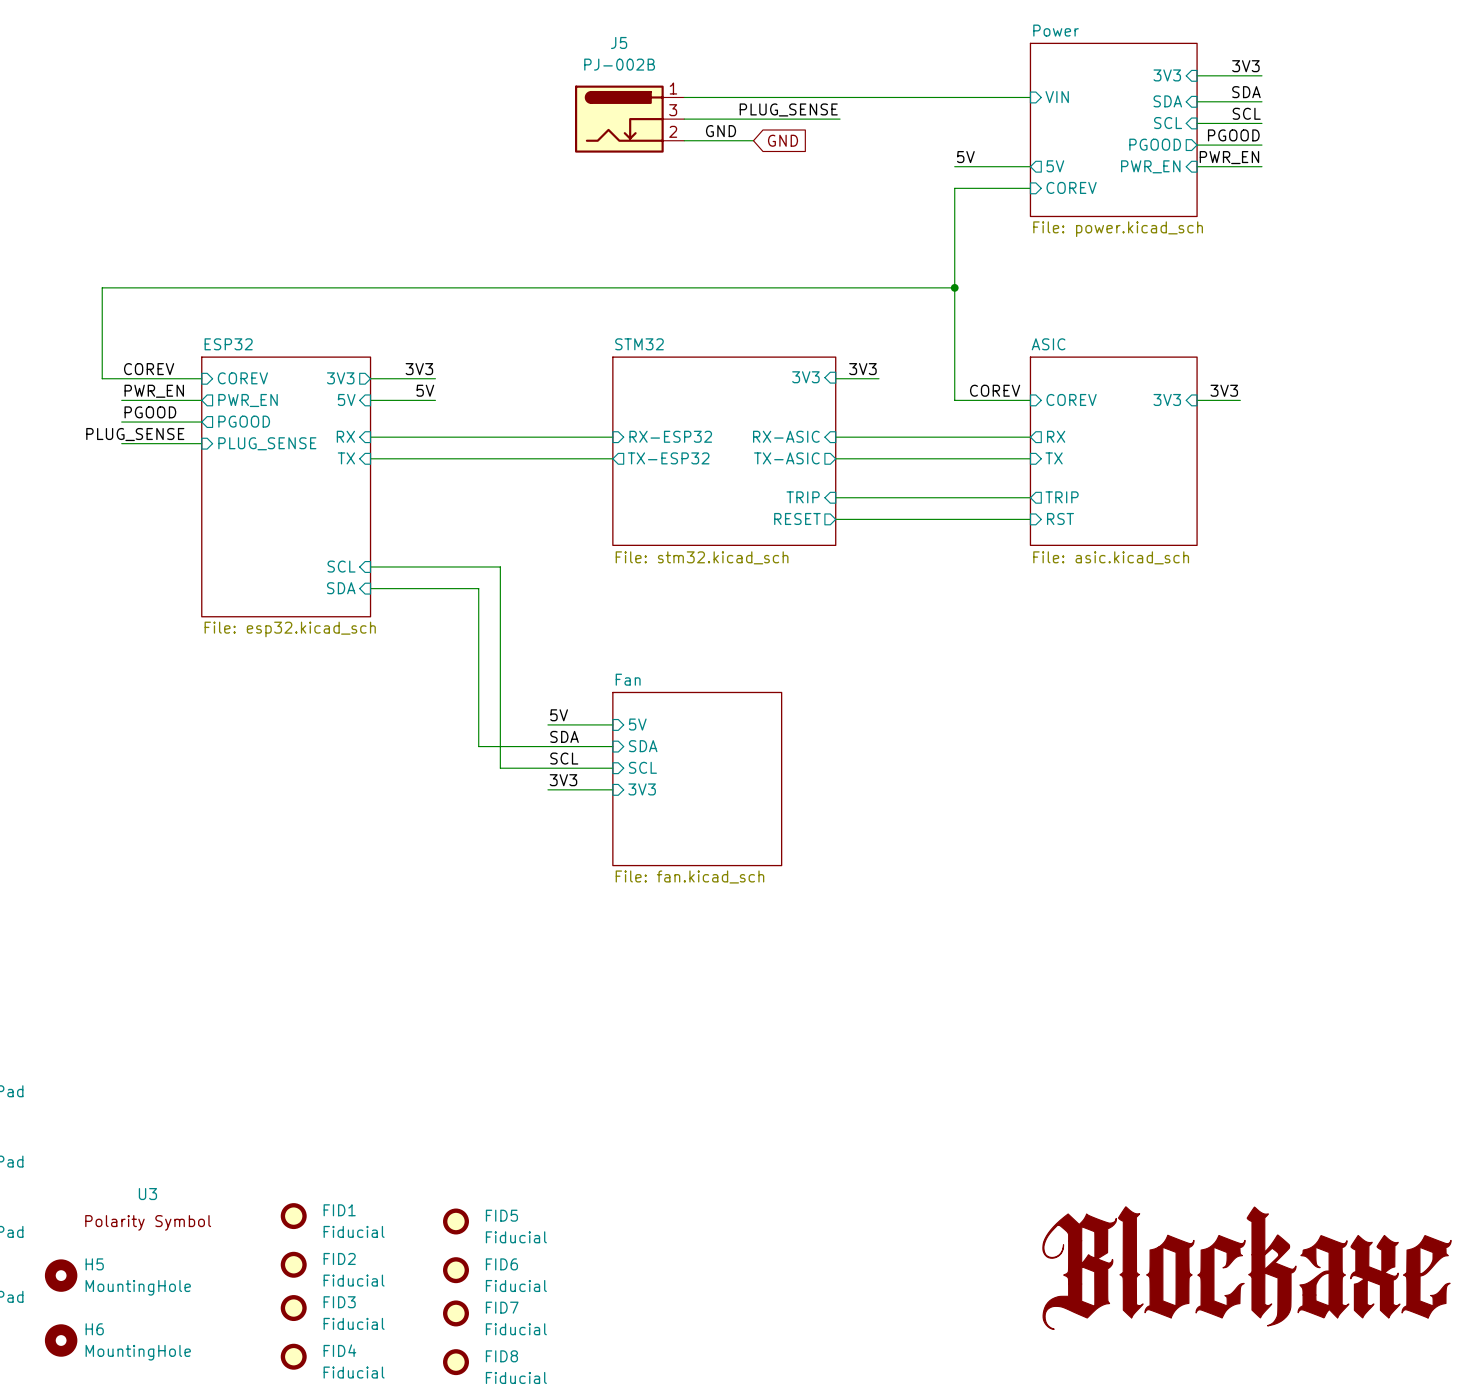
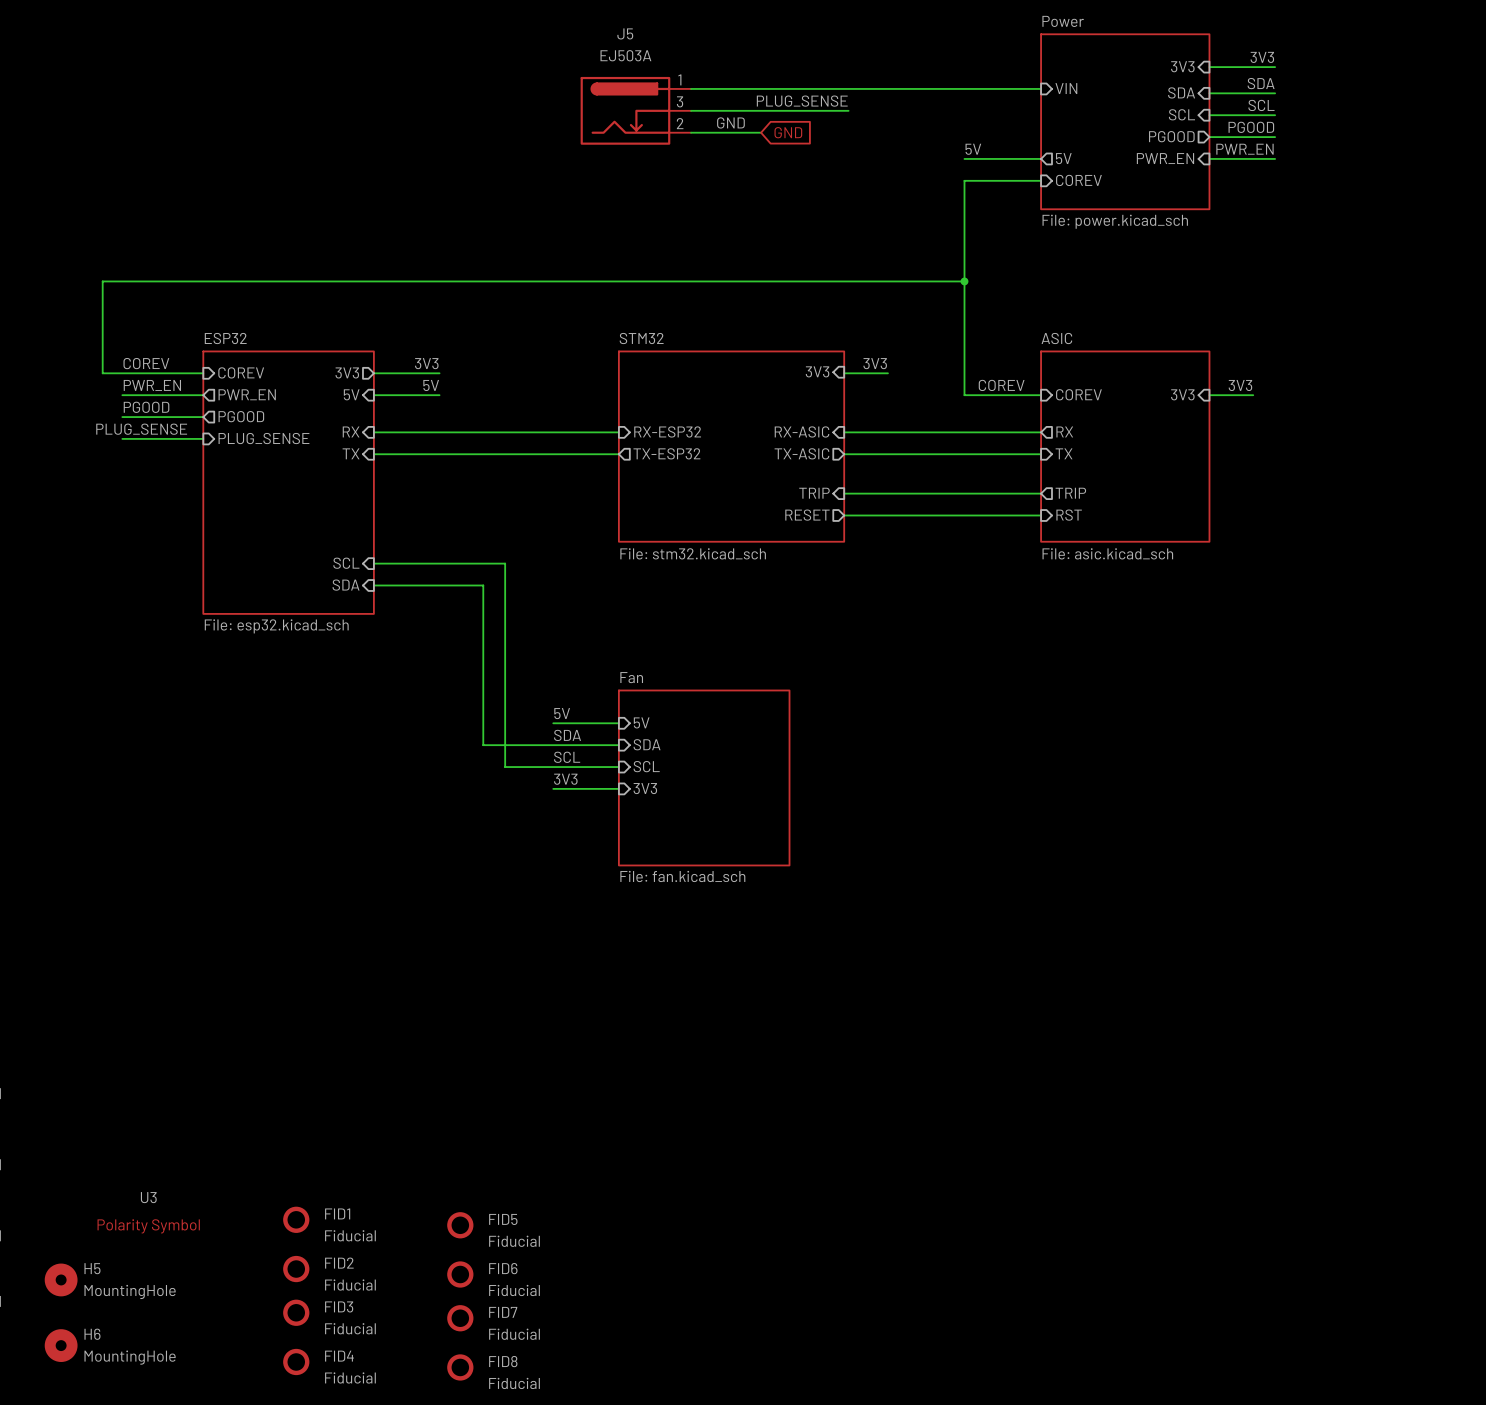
J5 value: PJ-002B (619, 64) -> EJ503A (625, 55)
power symbol: (1246, 1268) -> none

